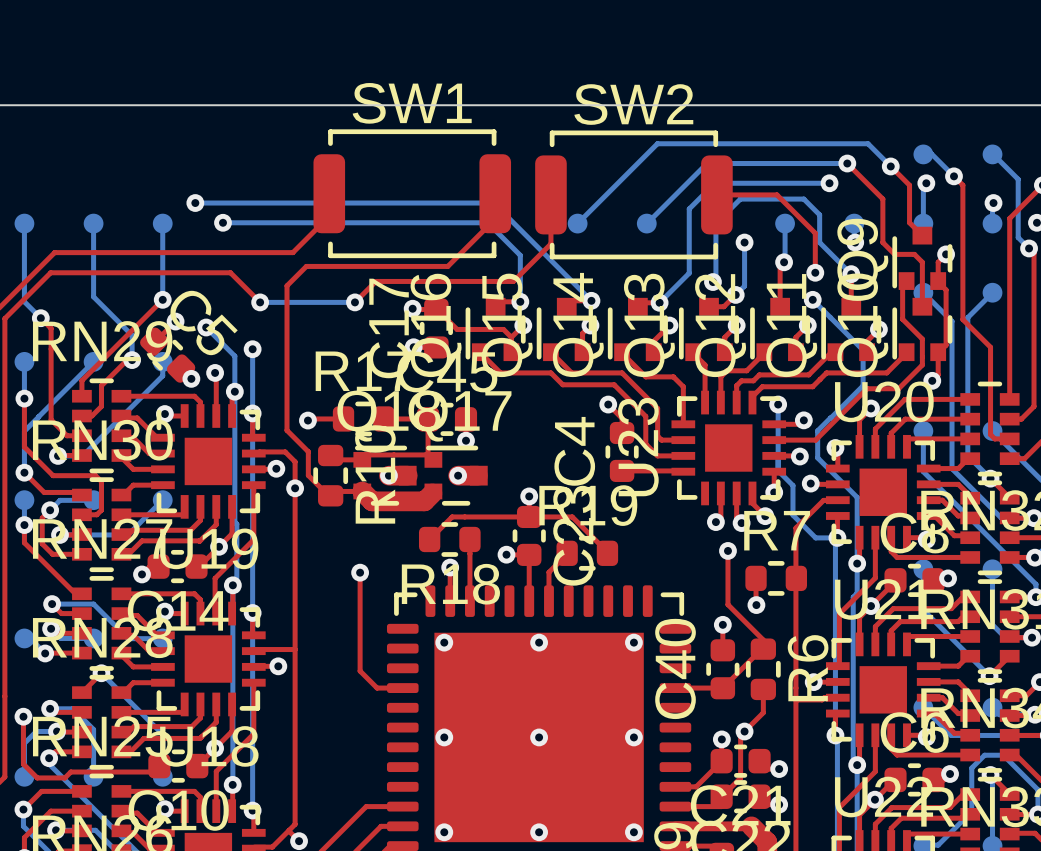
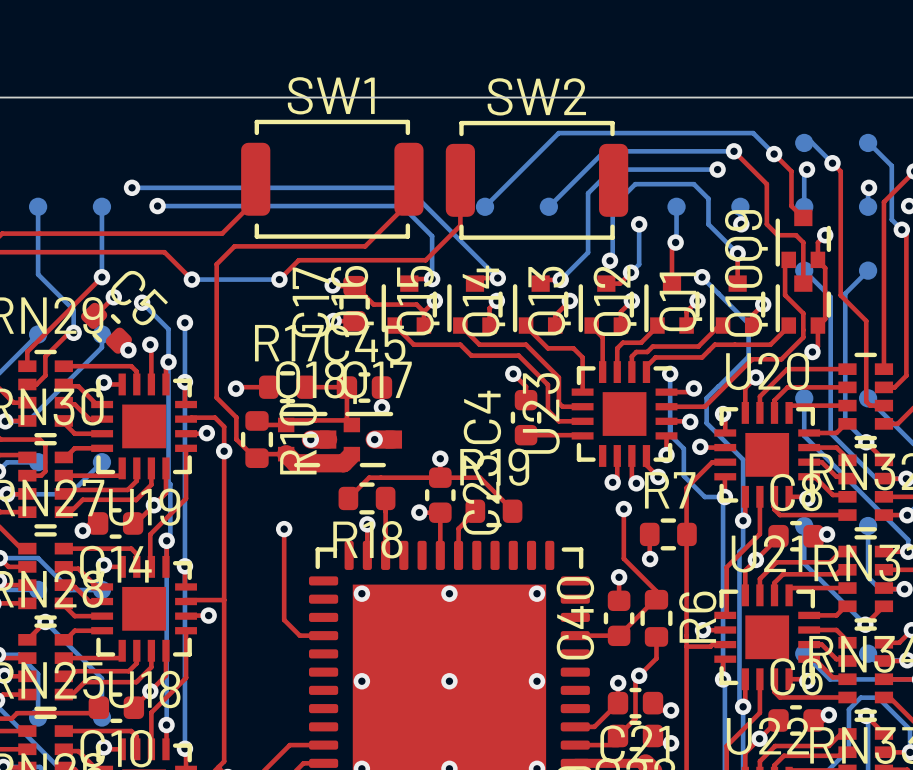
top track: (716, 194) (776, 194) (815, 233) (815, 272) -> none
via: (815, 272) -> none

